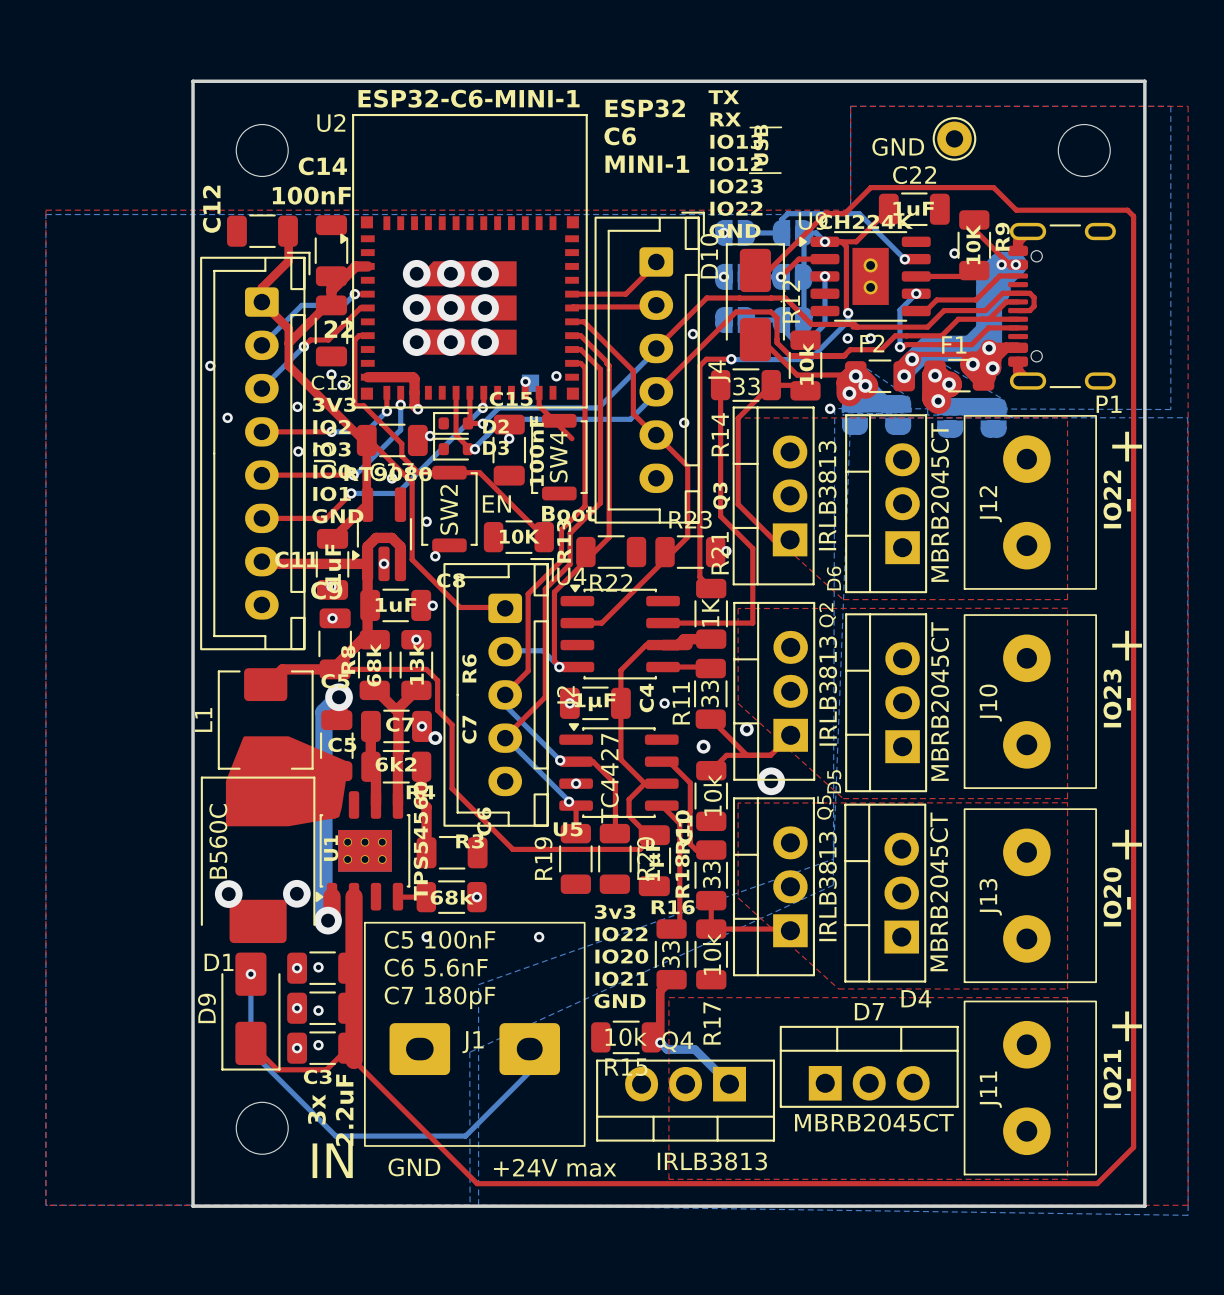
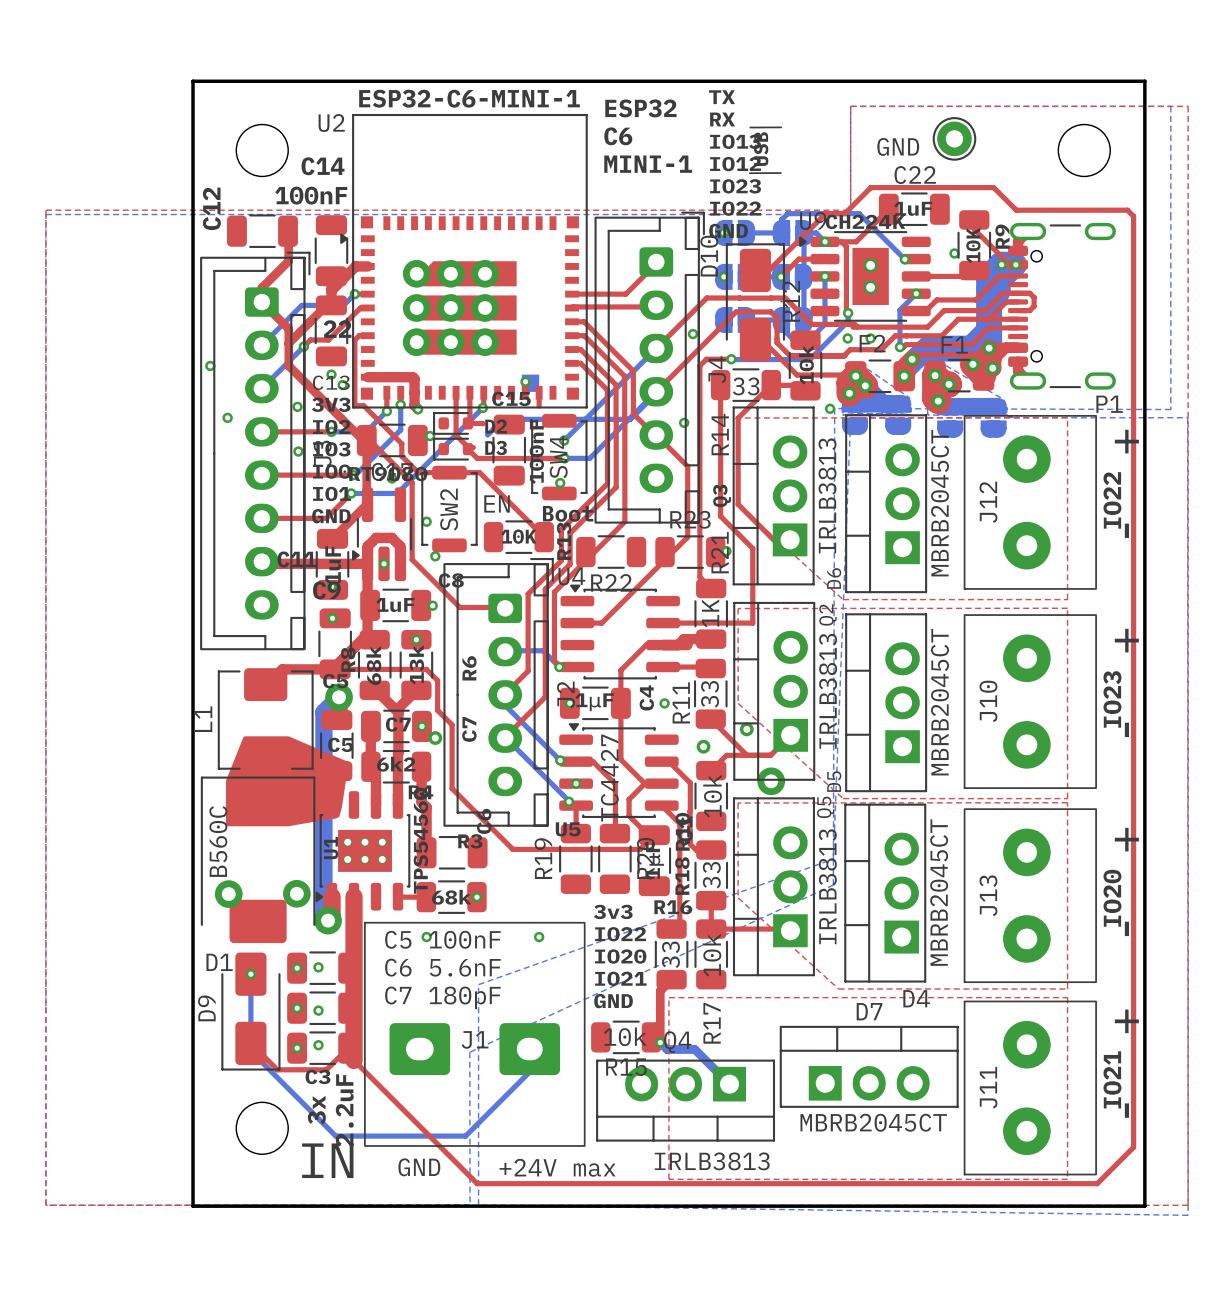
top track: (580, 335) (609, 365) (609, 537) -> (624, 417) (624, 521) (609, 537)
top track: none -> (580, 335) (584, 335) (624, 376) (624, 417)
bottom track: none -> (656, 348) (564, 440)
bottom track: (656, 350) (598, 407) (498, 407) (482, 423) -> none
top track: (585, 367) (585, 506) -> (607, 424) (607, 483) (585, 506)
top track: none -> (585, 367) (607, 390) (607, 424)
top track: (600, 369) (600, 502) -> (616, 421) (616, 487) (600, 502)
top track: none -> (600, 369) (616, 384) (616, 420)
via: (556, 376) -> none
bottom track: none -> (656, 391) (589, 458) (564, 458)
top track: (539, 405) (571, 438) -> none
via: (482, 423) -> none
bottom track: (487, 435) (474, 449) -> none
via: (509, 438) -> none
via: none -> (564, 440)
top track: none -> (467, 449) (477, 458) (564, 458)
via: (474, 449) -> none
via: none -> (564, 458)
via: none -> (560, 483)

